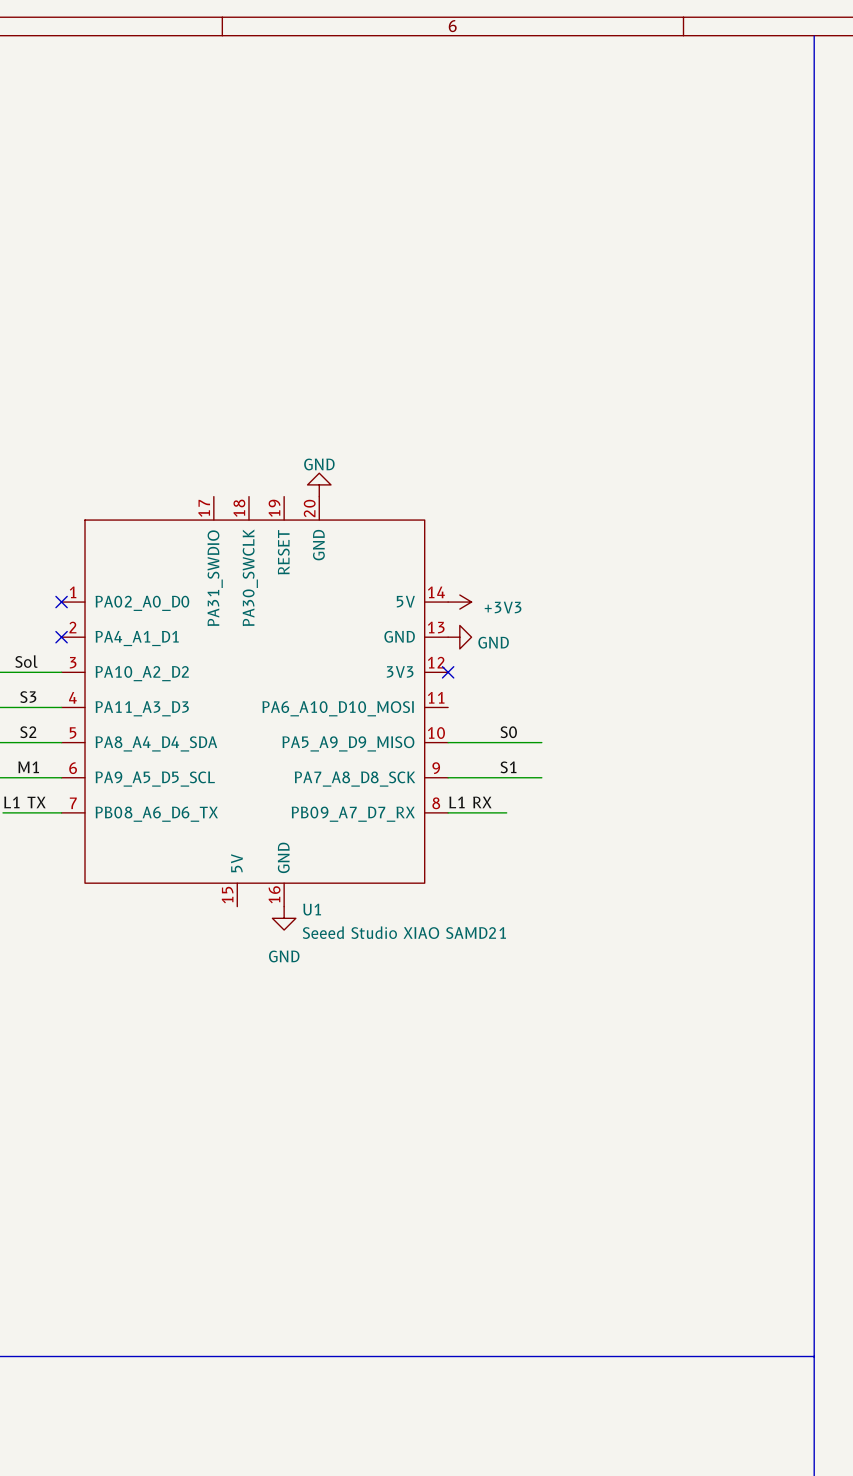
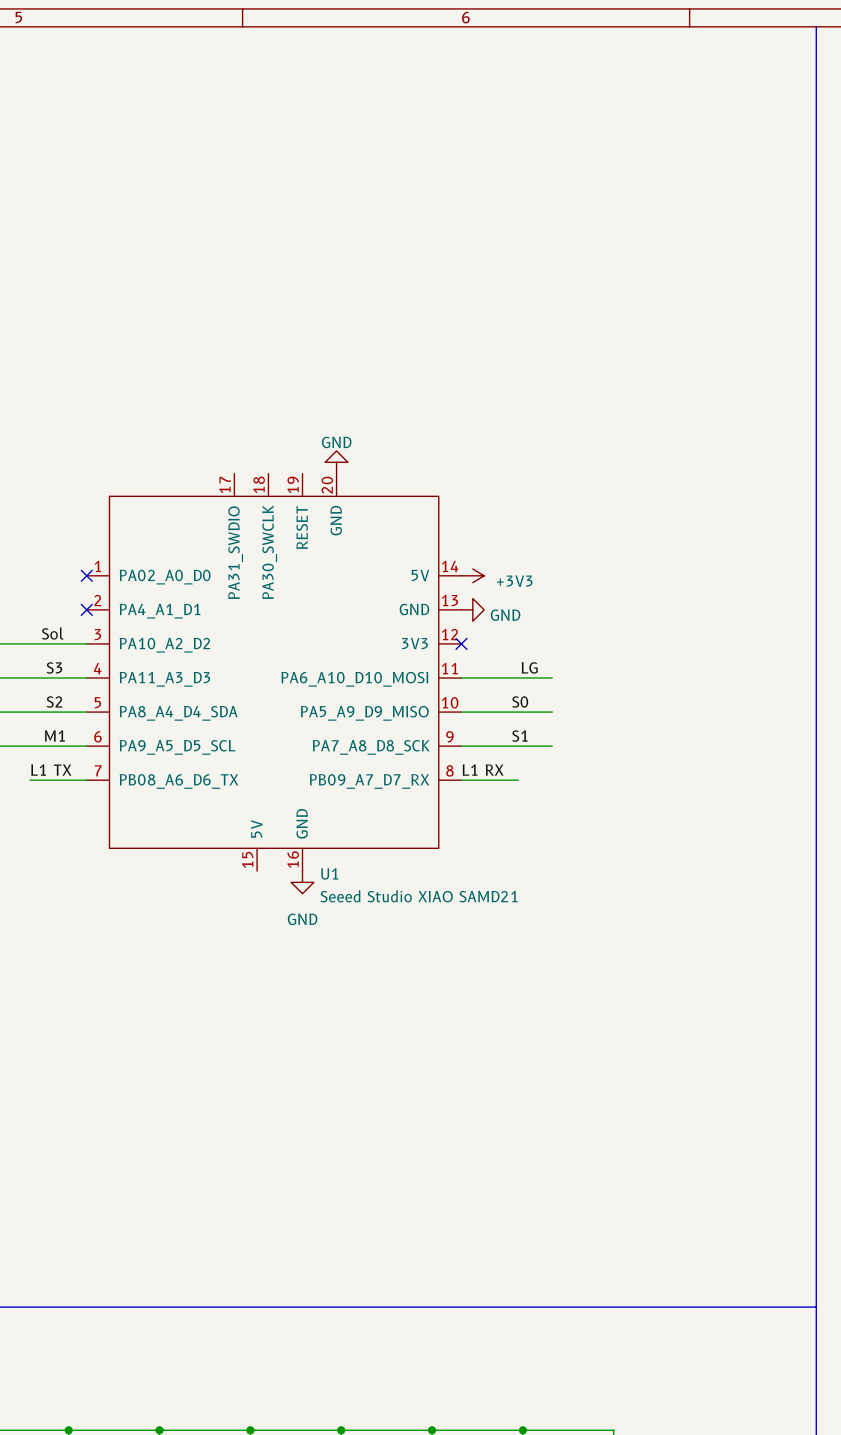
label: none -> LG (529, 667)
wire: none -> (461, 678) (552, 678)

